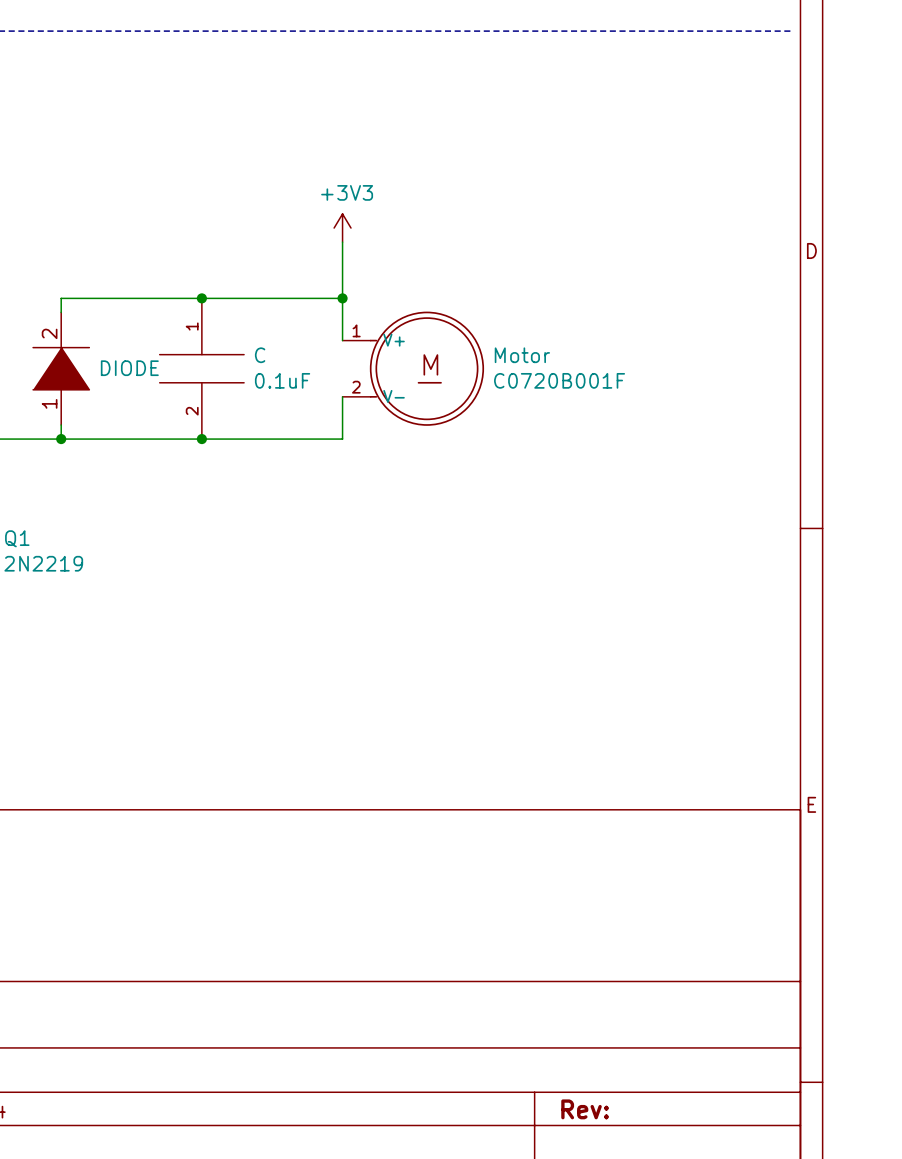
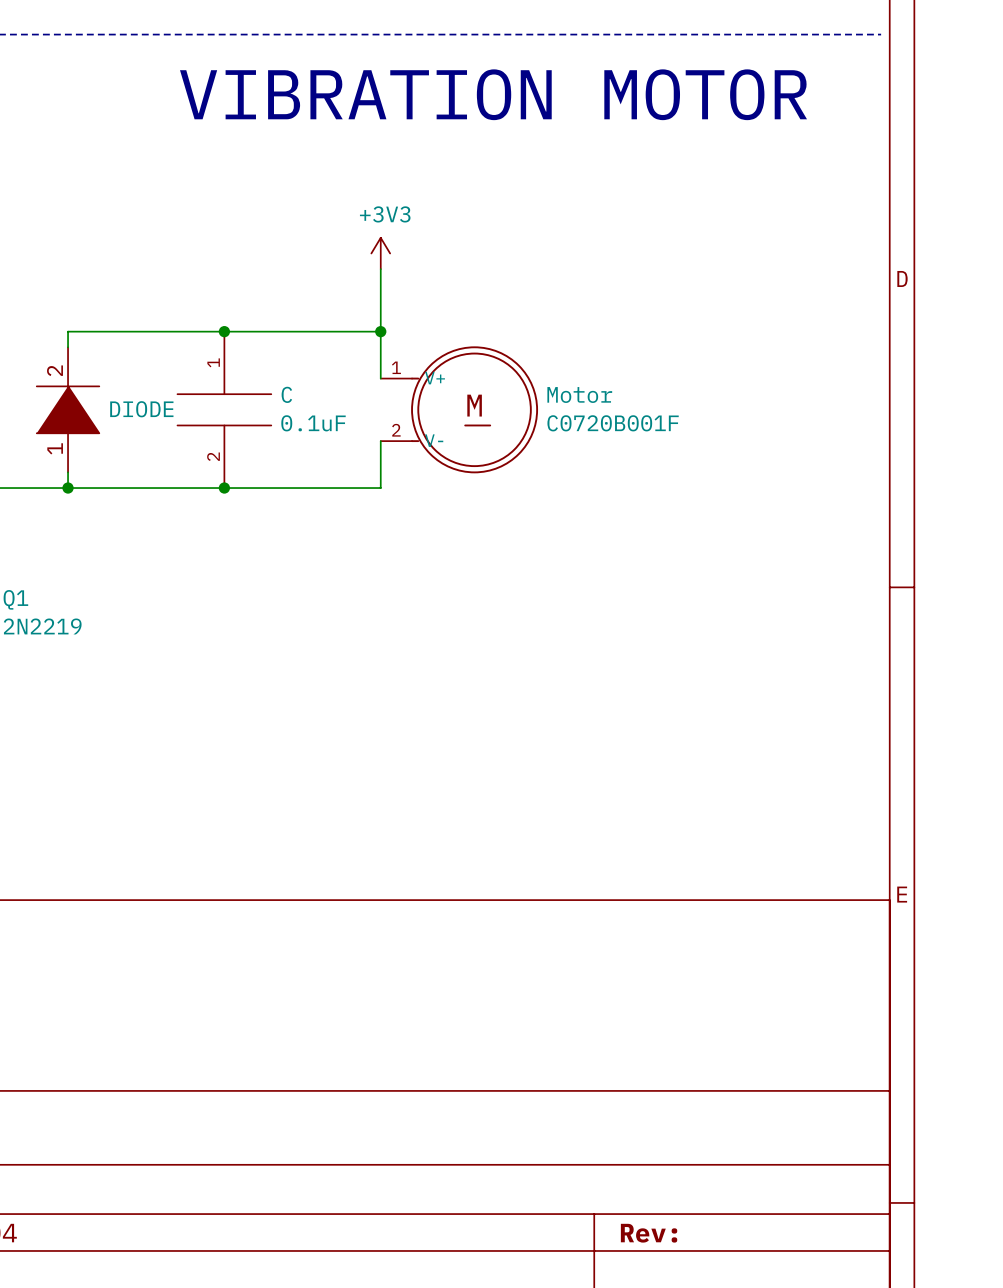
text: none -> VIBRATION MOTOR (493, 94)

